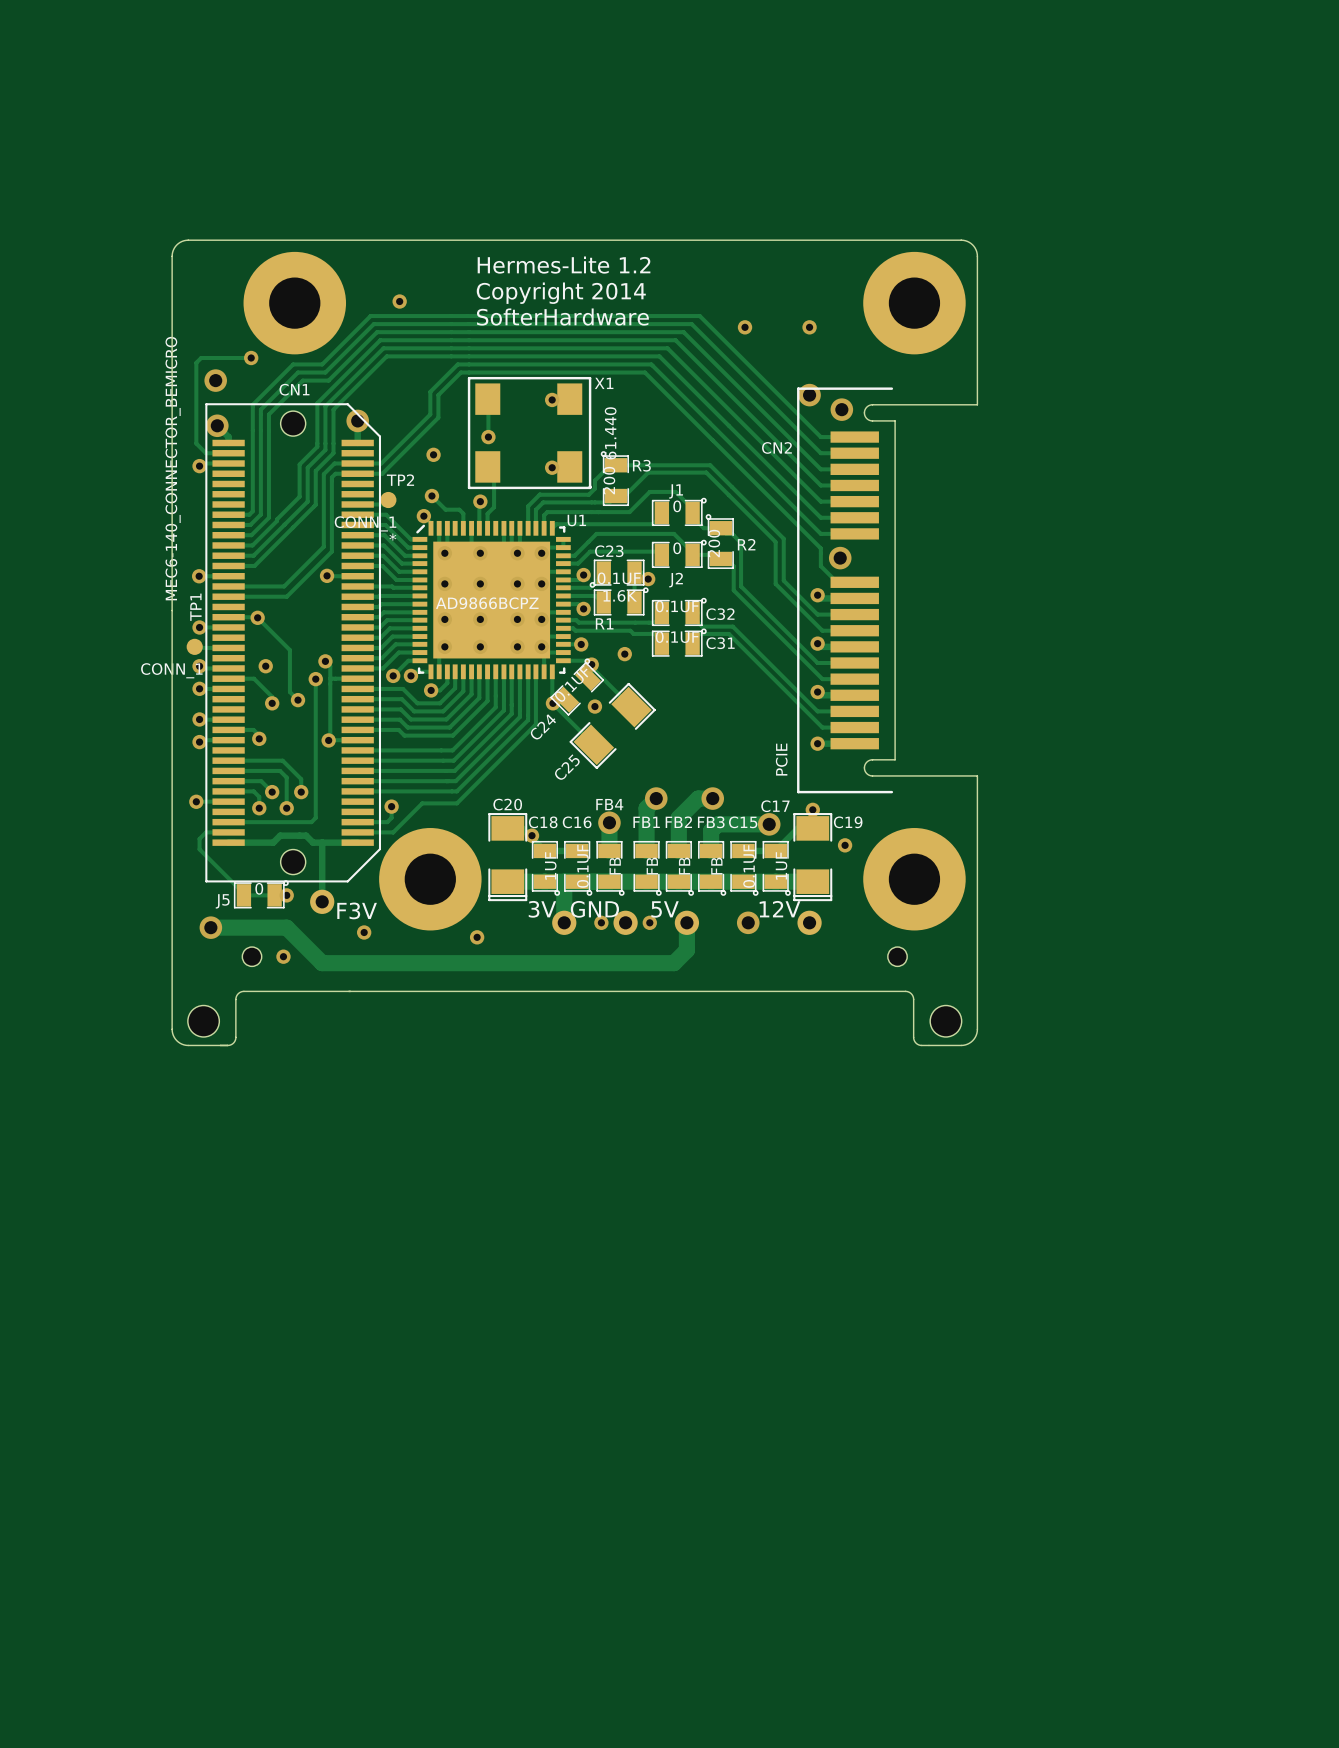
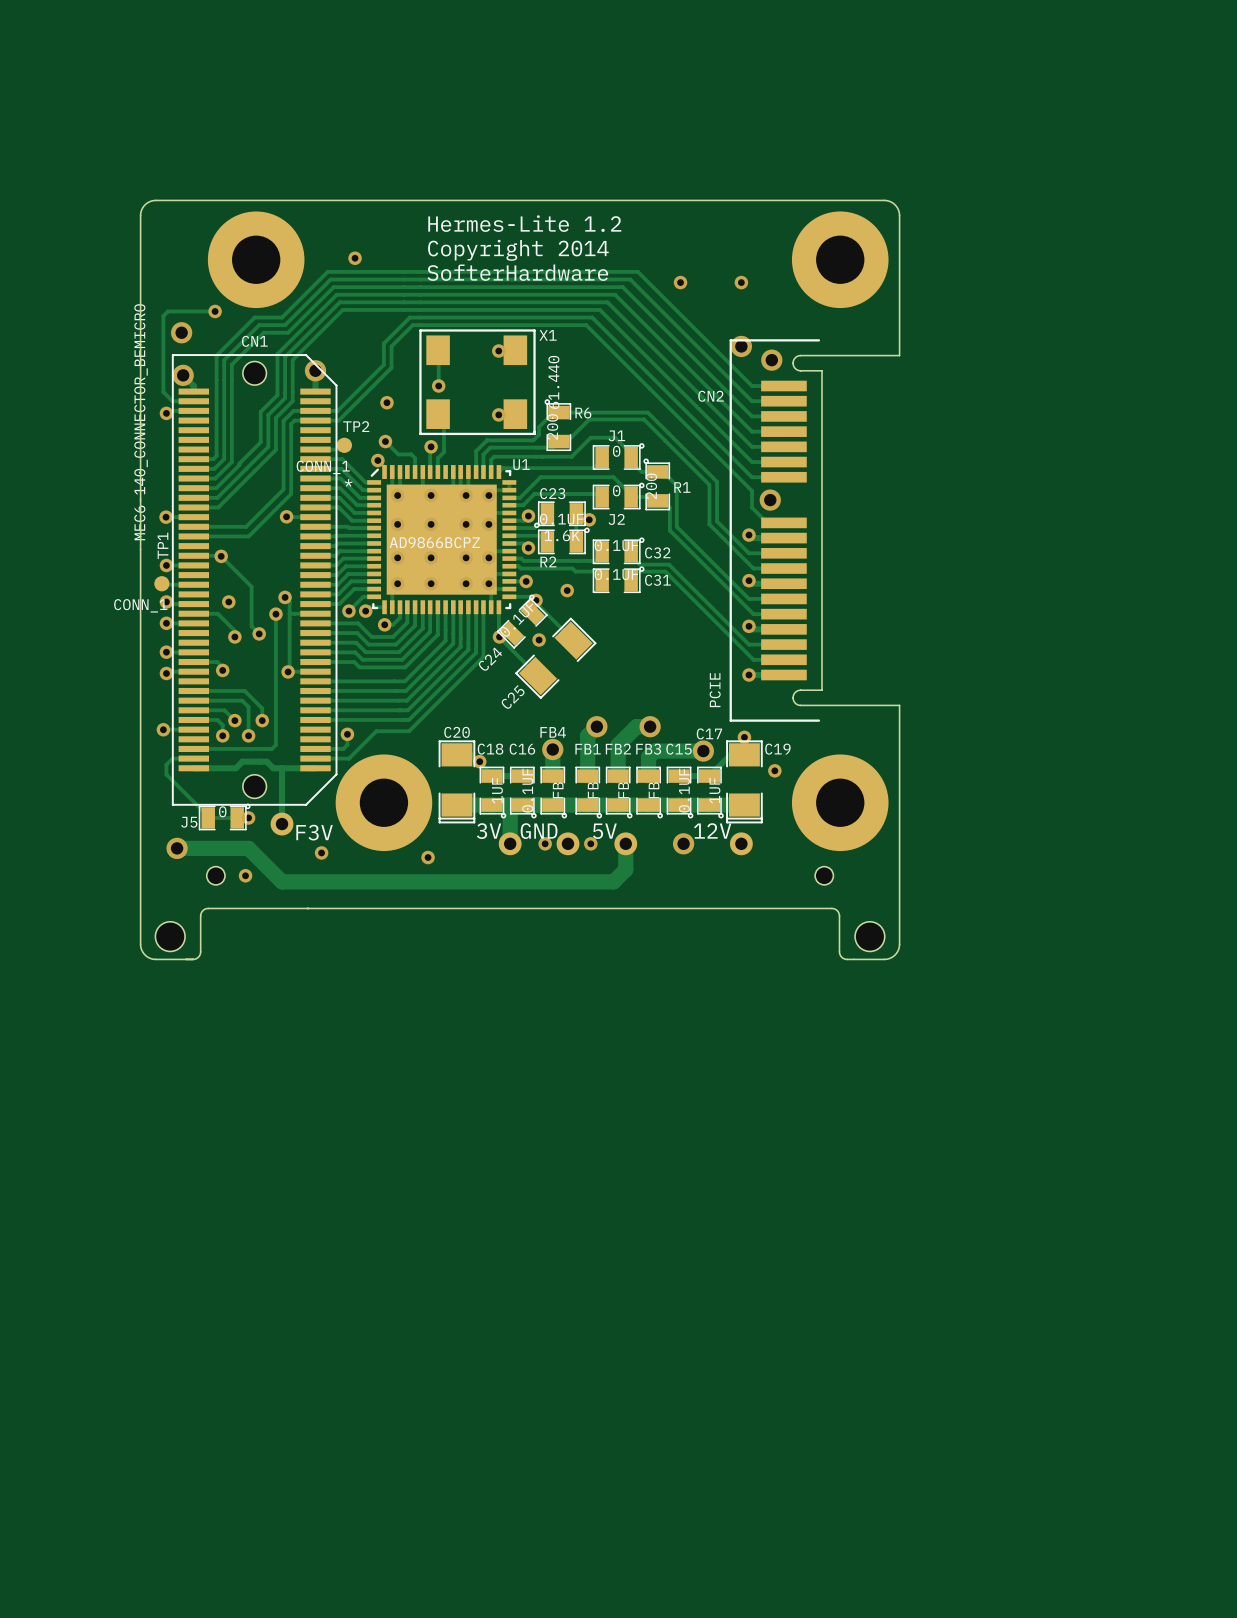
R3 name: R3 (641, 465) -> R6 (583, 413)
R2 name: R2 (746, 544) -> R1 (682, 487)
R1 name: R1 (604, 623) -> R2 (548, 561)

